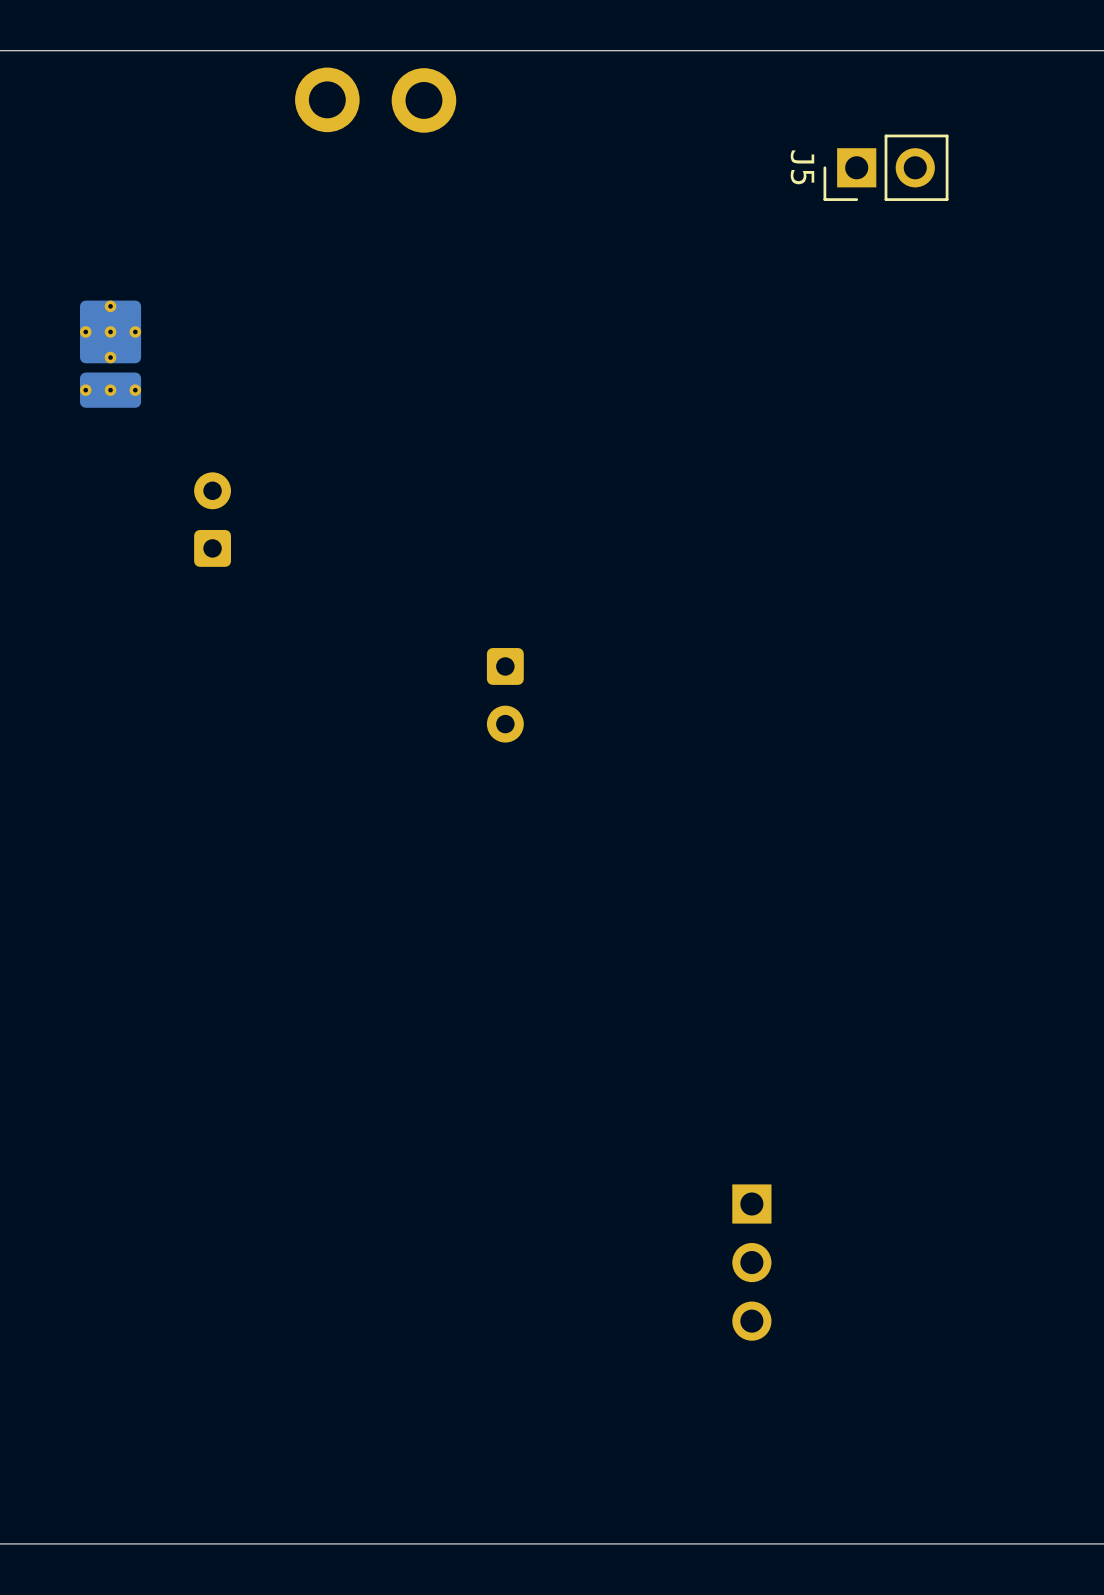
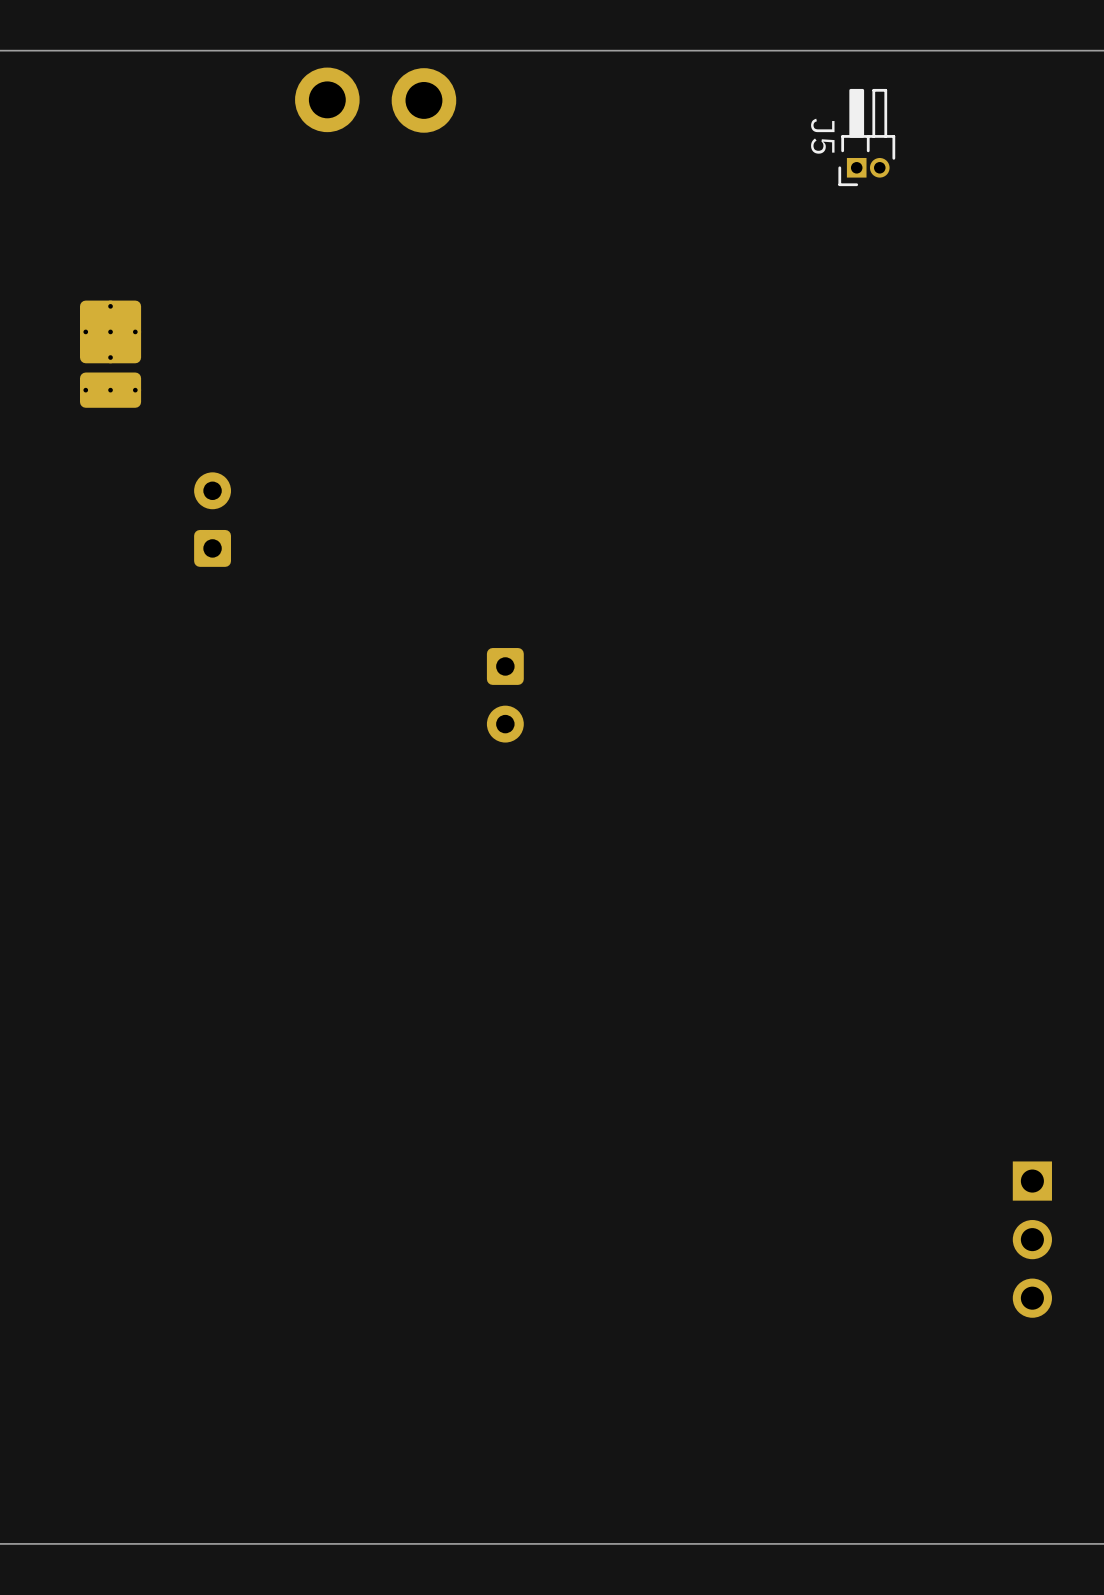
J5 footprint: [823, 134, 949, 201] -> [838, 88, 896, 187]
part position: (751, 1262) -> (1032, 1239)

